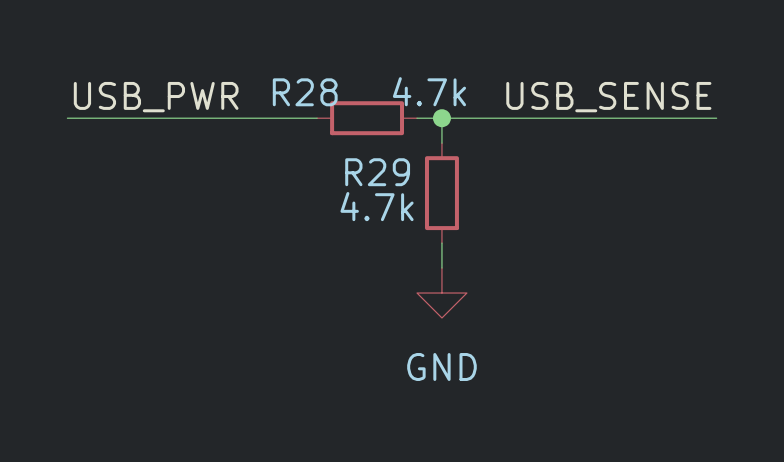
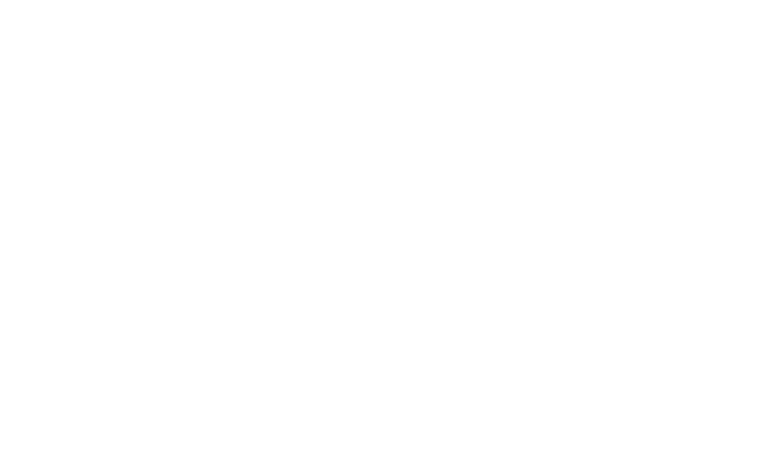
label: USB_PWR (156, 97) -> none
label: USB_SENSE (608, 97) -> none
wire: (67, 118) (317, 118) -> none
R28: 4.7k (367, 118) -> none
wire: (416, 118) (716, 118) -> none
wire: (441, 118) (441, 143) -> none
junction: (441, 118) -> none
R29: 4.7k (441, 193) -> none
wire: (441, 243) (441, 268) -> none
power symbol: GND (441, 293) -> none

